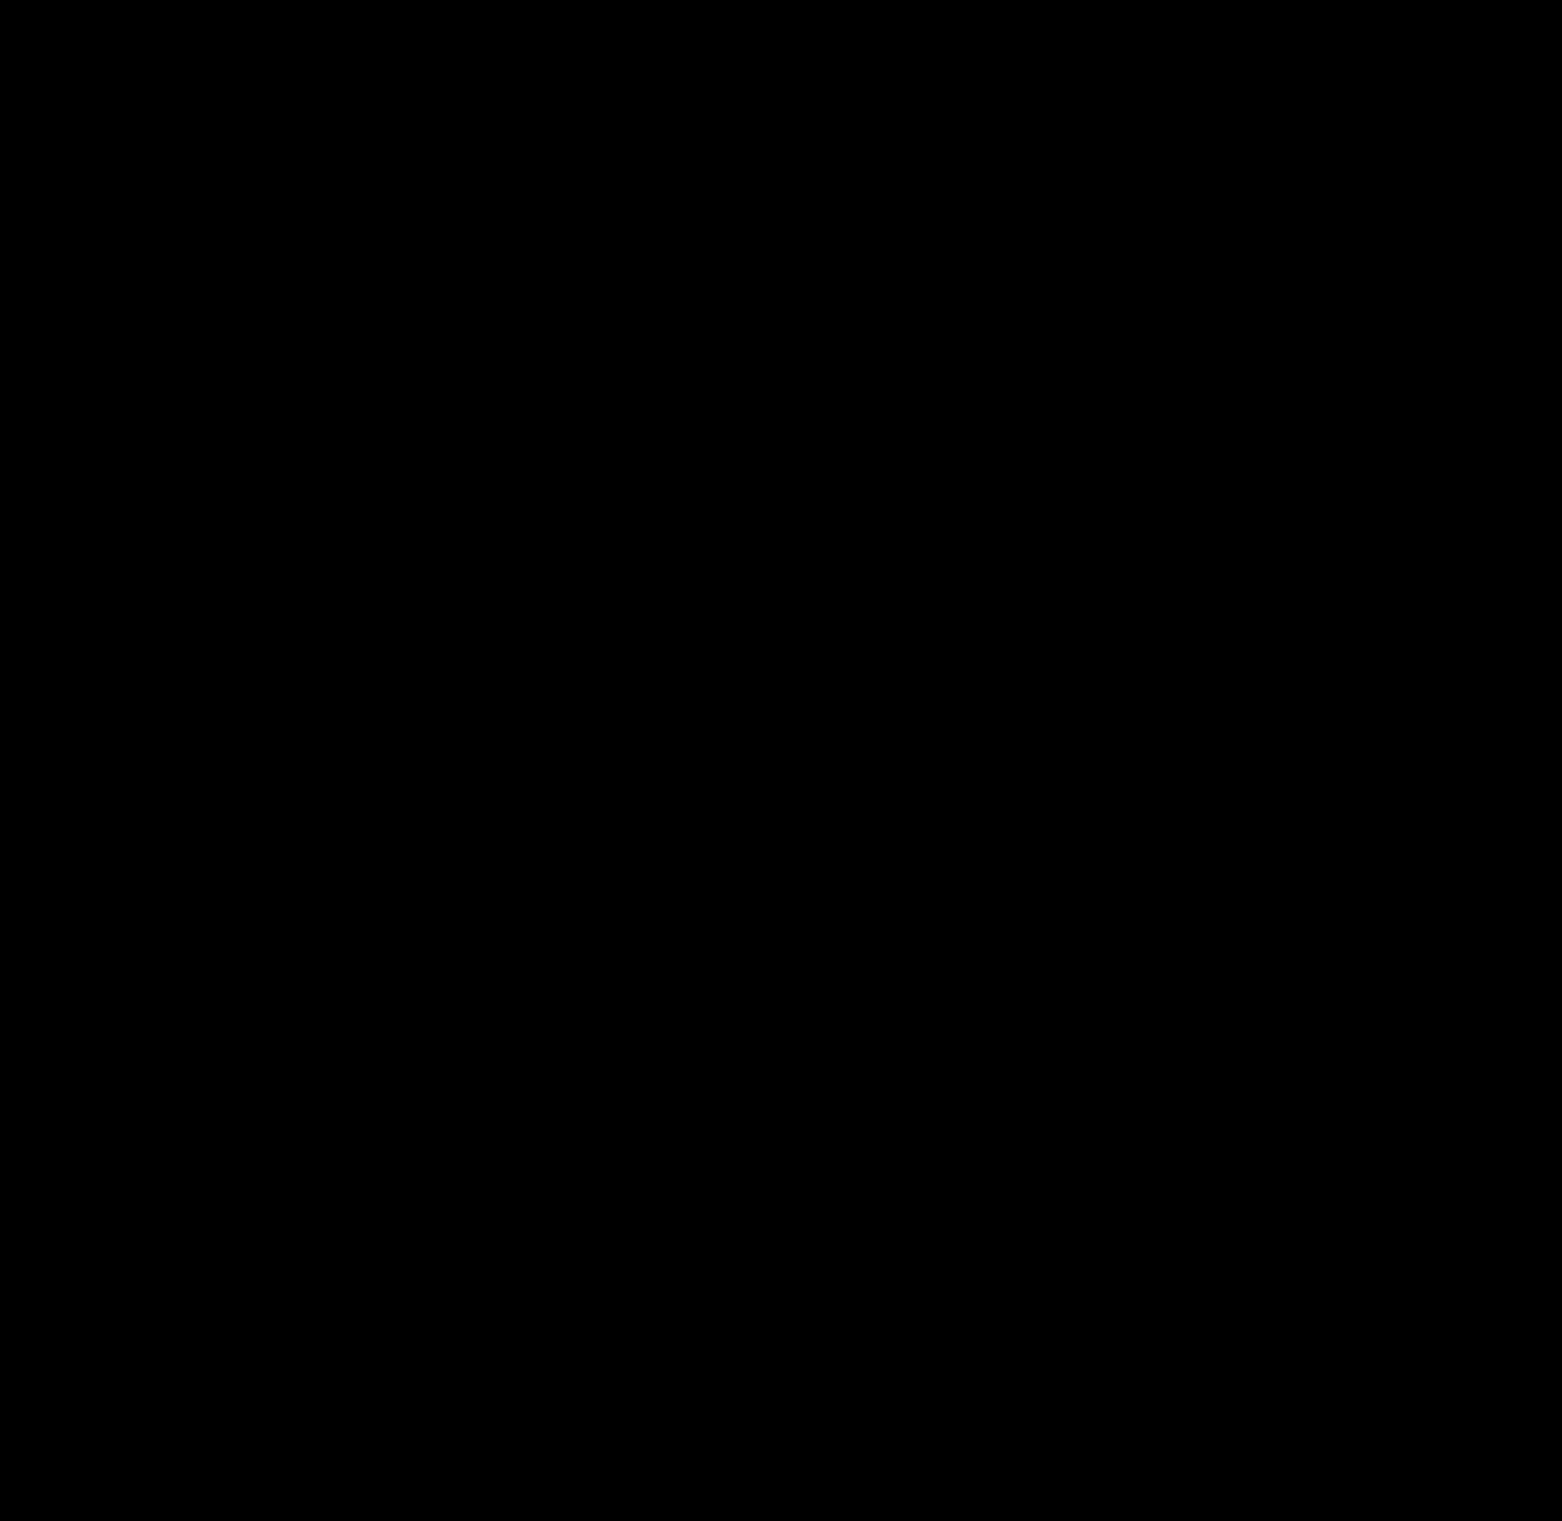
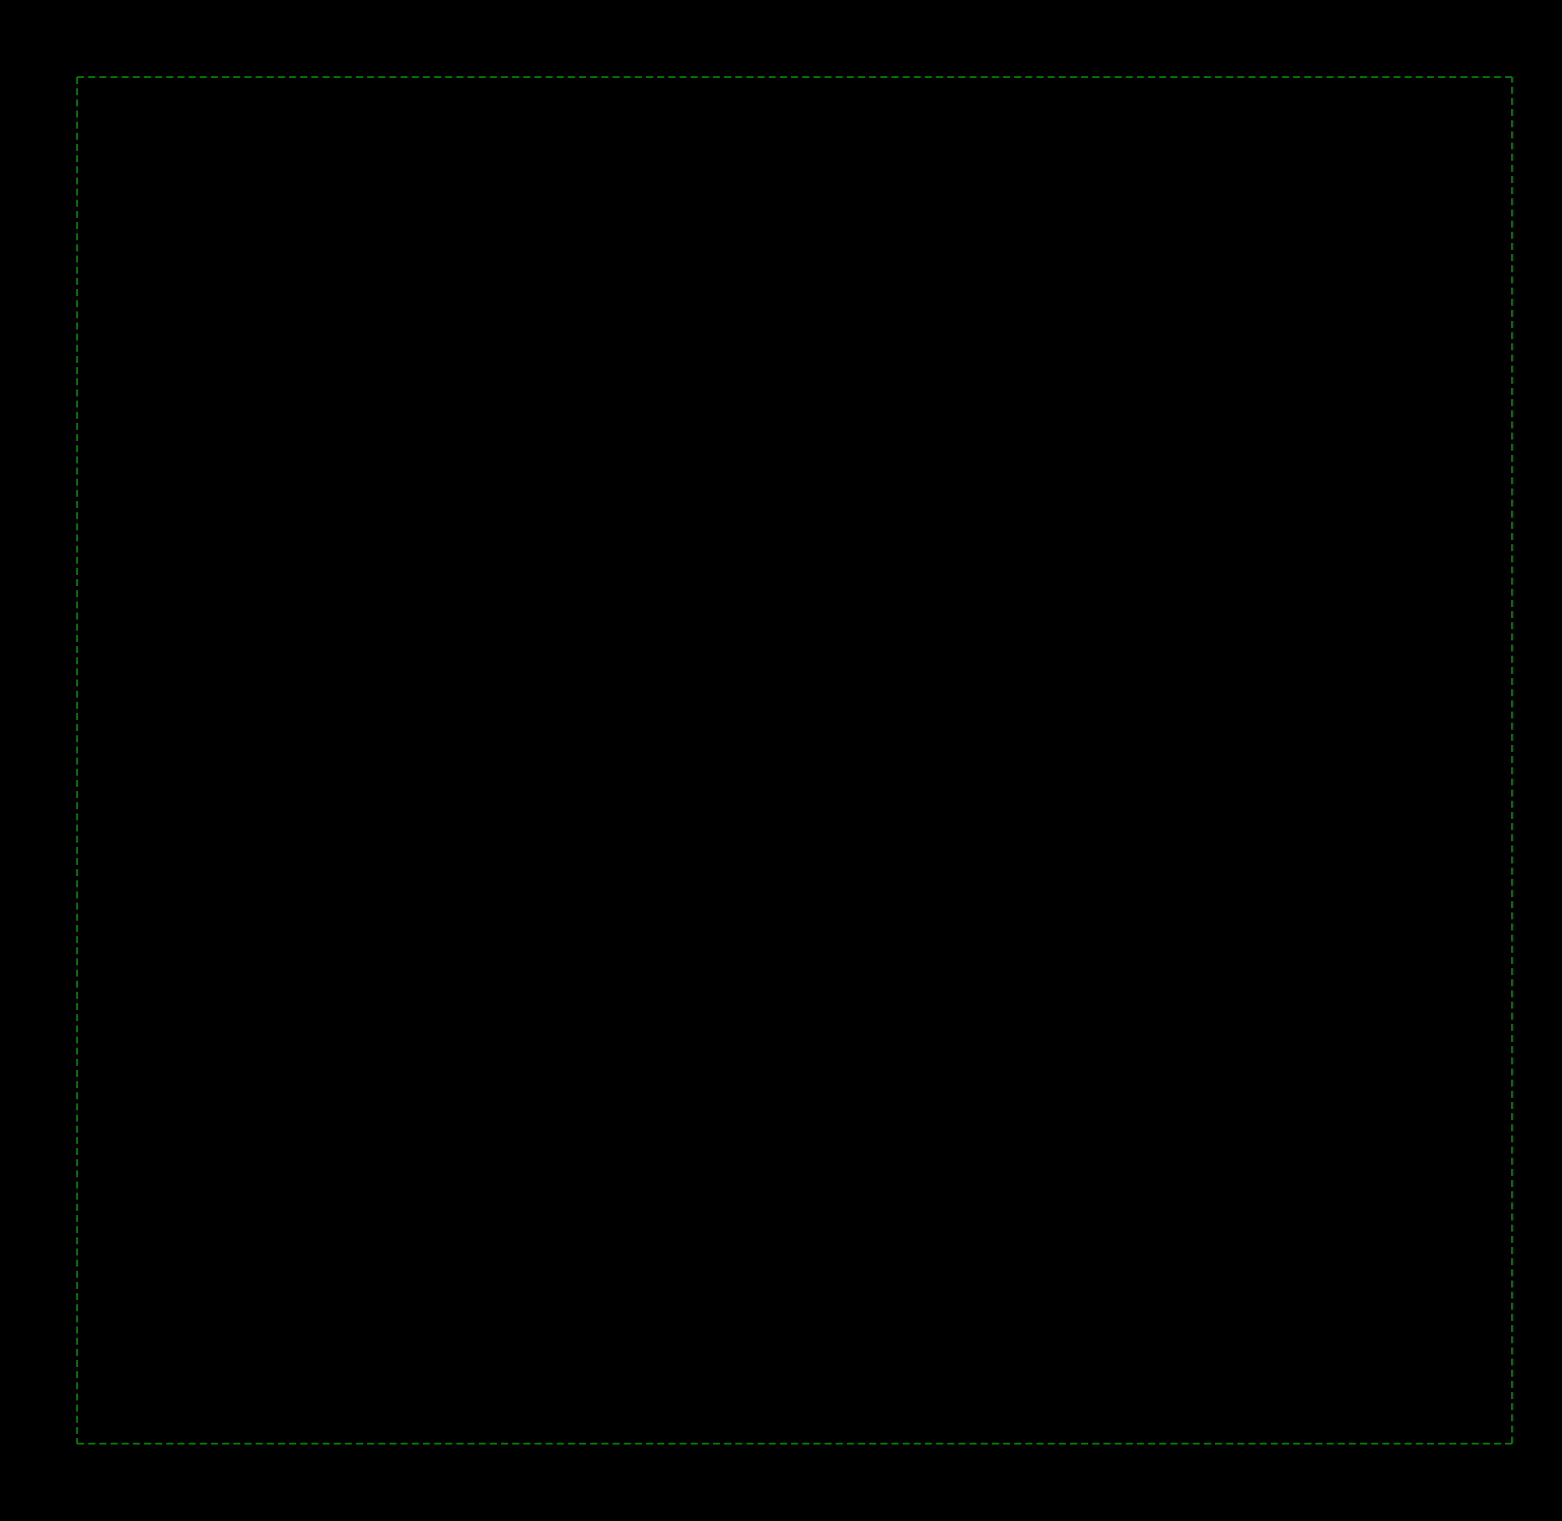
zone outline: none -> (1511, 77) (1511, 1443) (77, 1443) (77, 77) (1511, 77)

